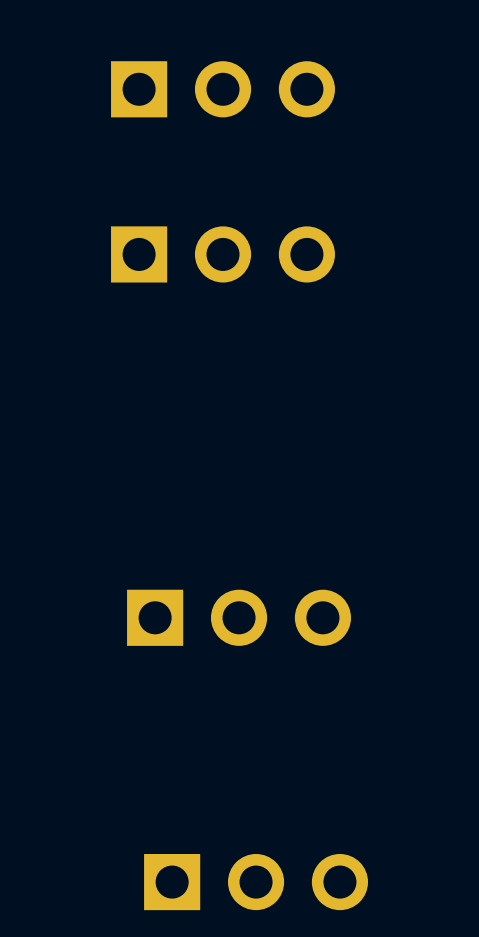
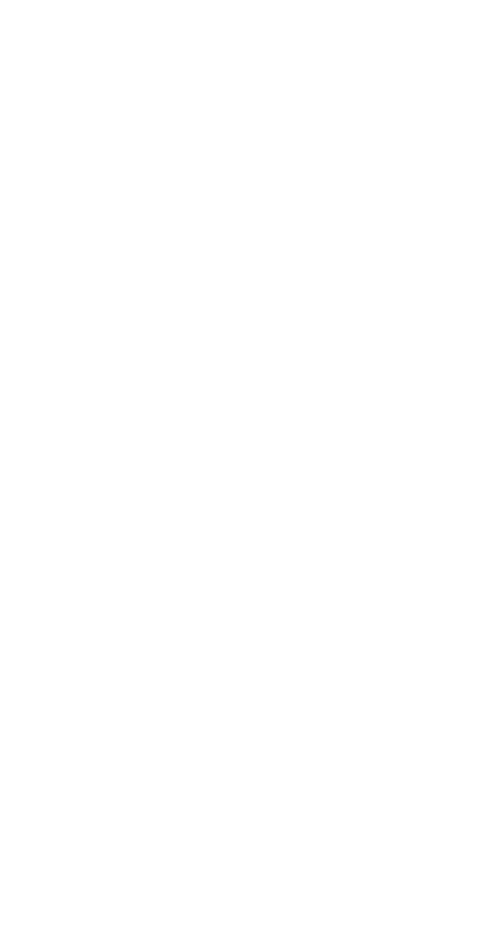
part: (223, 89) -> none
part: (223, 254) -> none
part: (239, 617) -> none
part: (256, 882) -> none

